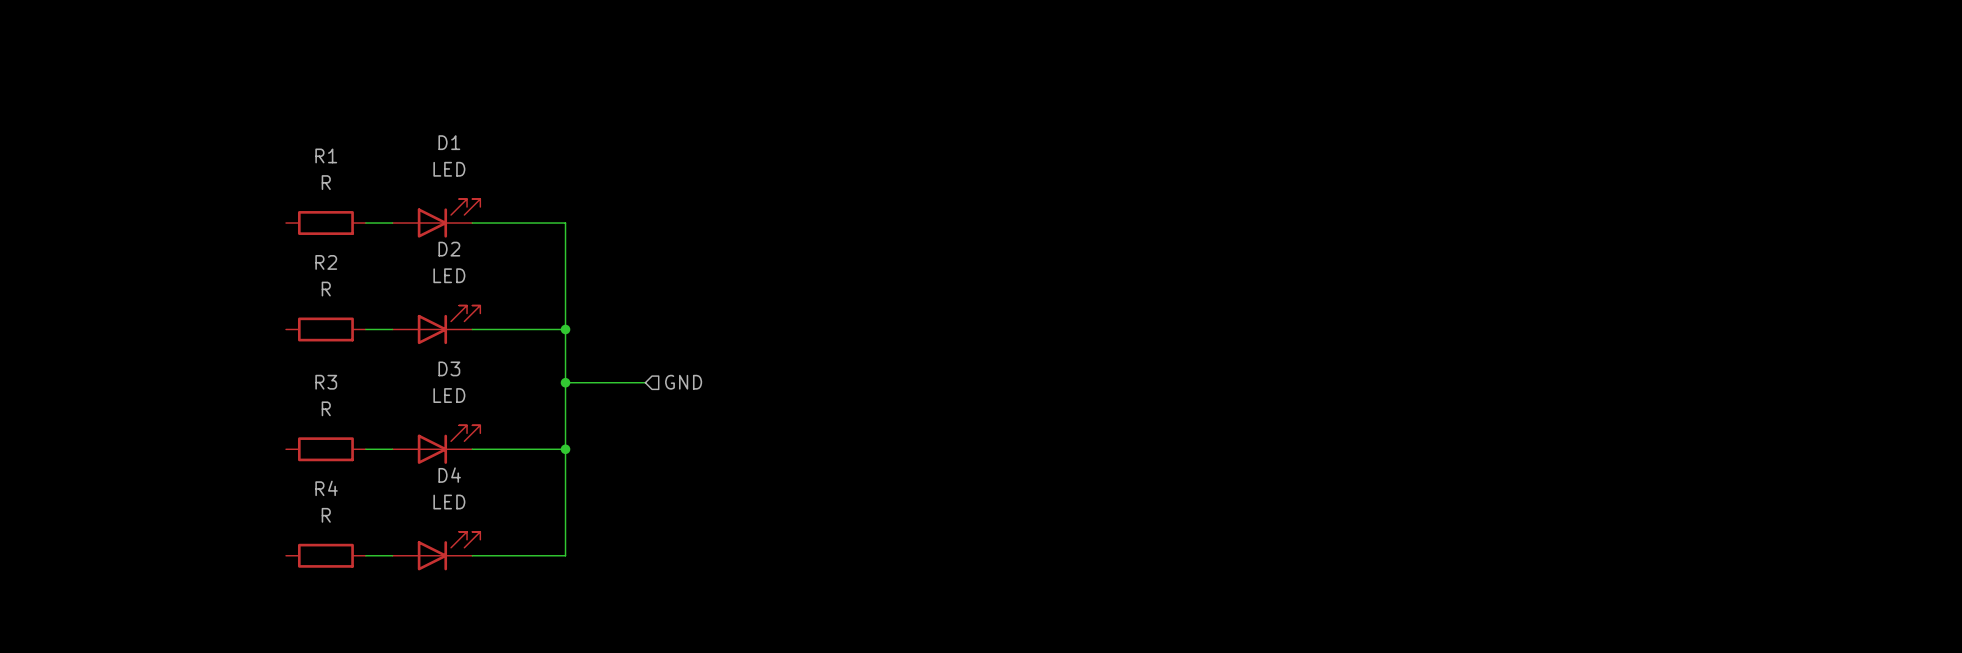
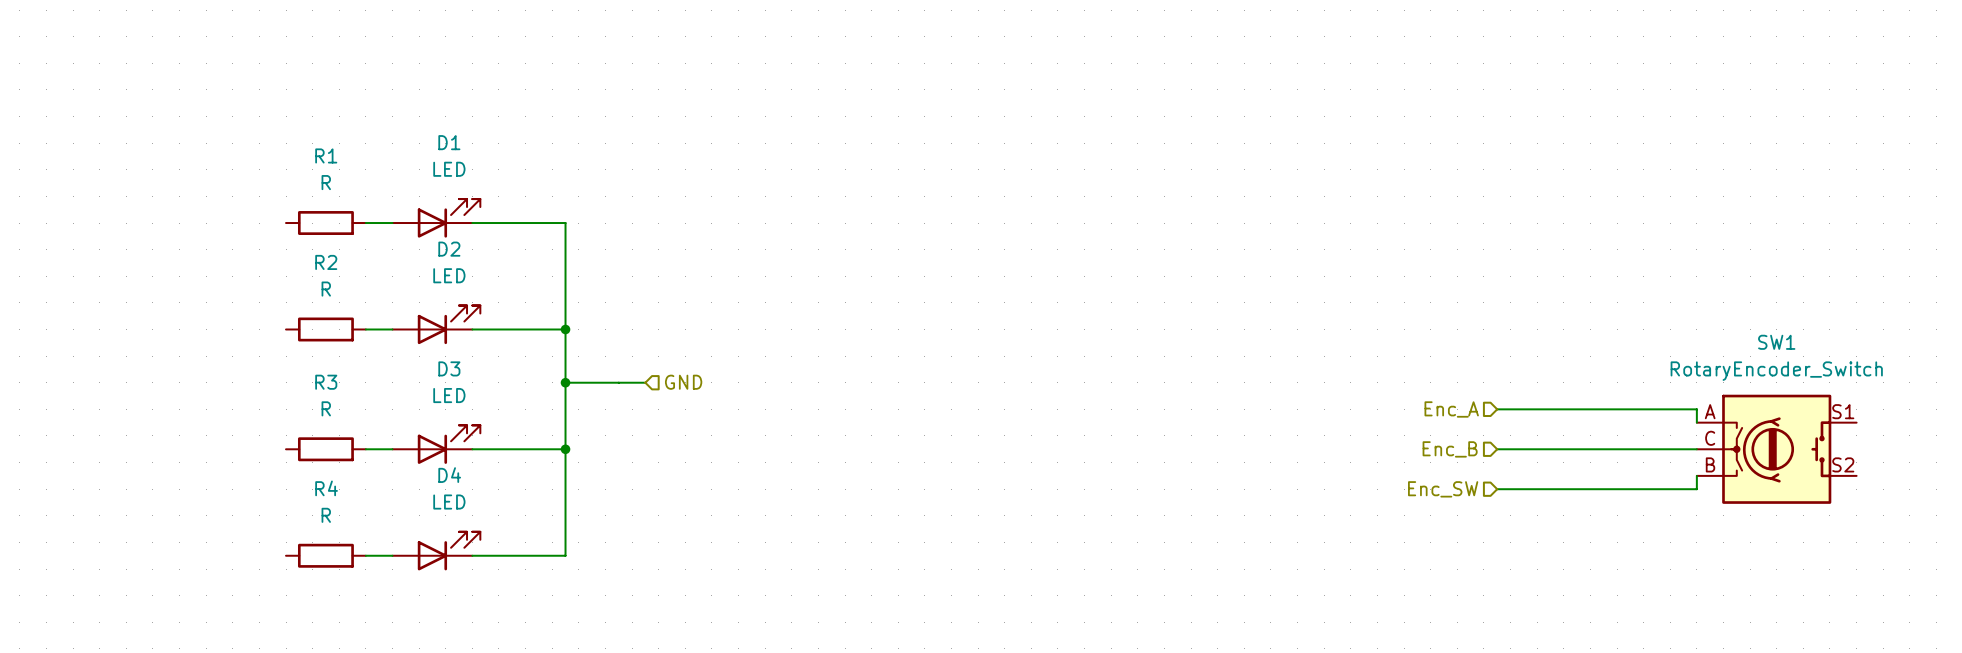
hierarchical label: none -> Enc_A (1451, 409)
wire: none -> (1497, 409) (1696, 409) (1696, 422)
hierarchical label: none -> Enc_B (1450, 449)
wire: none -> (1497, 449) (1696, 449)
SW1: none -> RotaryEncoder_Switch (1776, 449)
wire: none -> (1696, 475) (1696, 489) (1497, 489)
hierarchical label: none -> Enc_SW (1443, 489)

